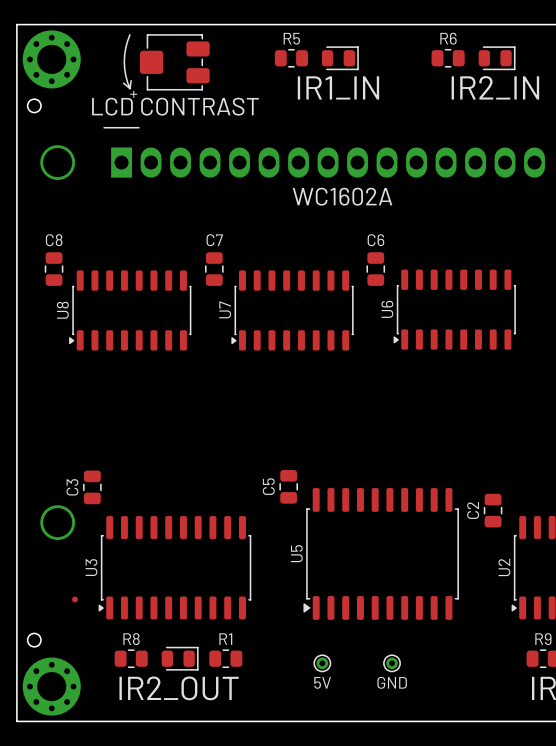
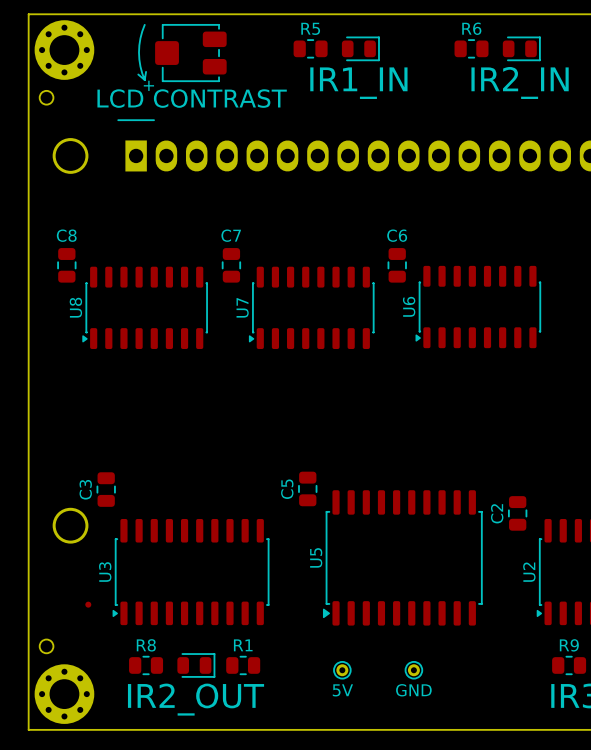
text: WC1602A (342, 196) -> none

